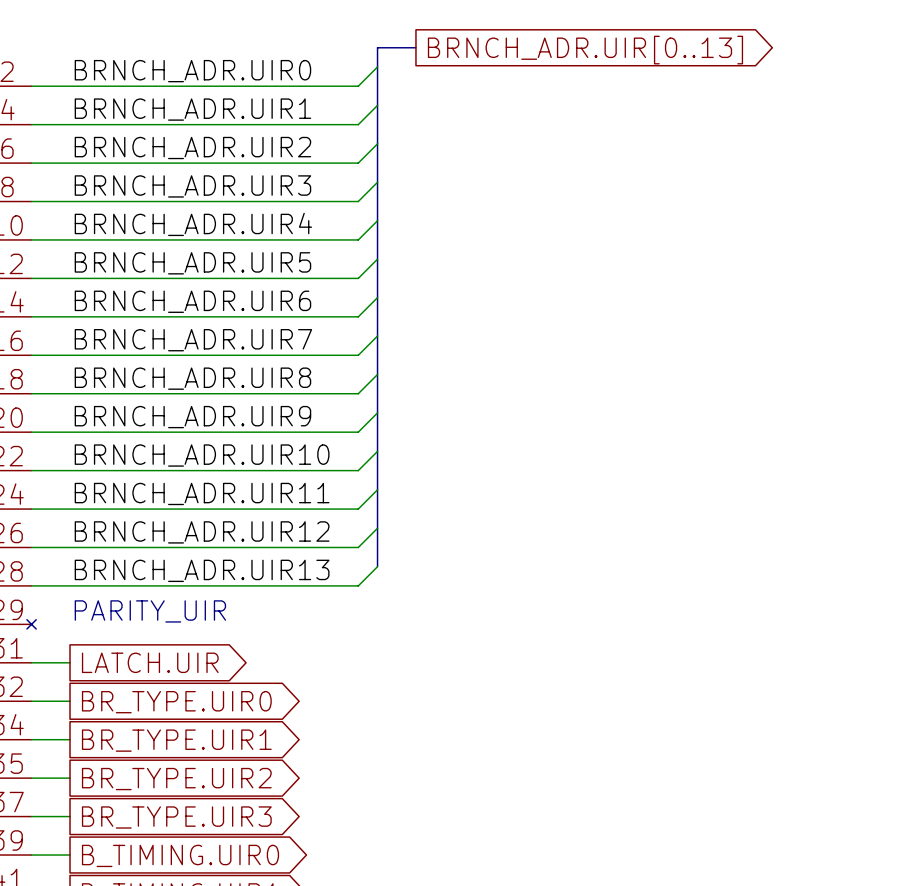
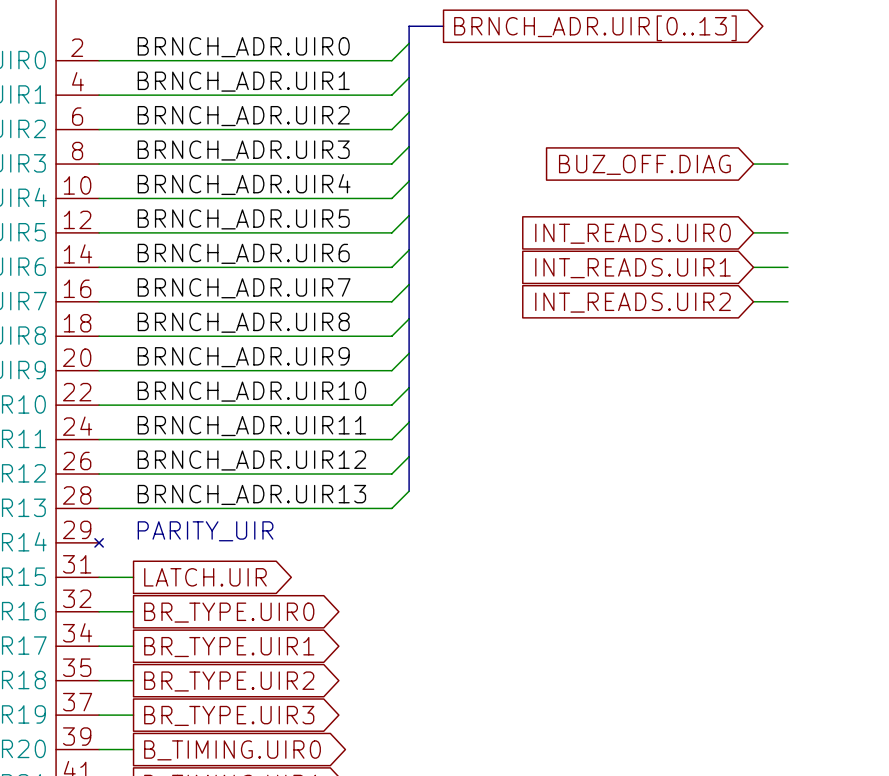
wire: none -> (753, 164) (787, 164)
global label: none -> BUZ_OFF.DIAG (644, 164)
wire: none -> (753, 232) (787, 232)
global label: none -> INT_READS.UIR0 (633, 233)
wire: none -> (753, 267) (787, 267)
global label: none -> INT_READS.UIR1 (633, 268)
wire: none -> (753, 301) (787, 301)
global label: none -> INT_READS.UIR2 (633, 302)

